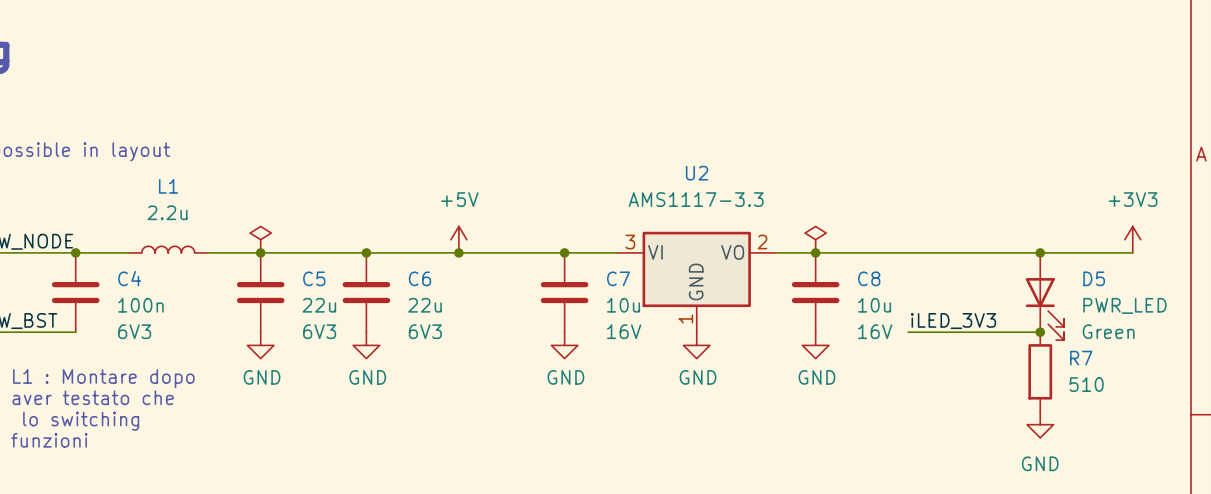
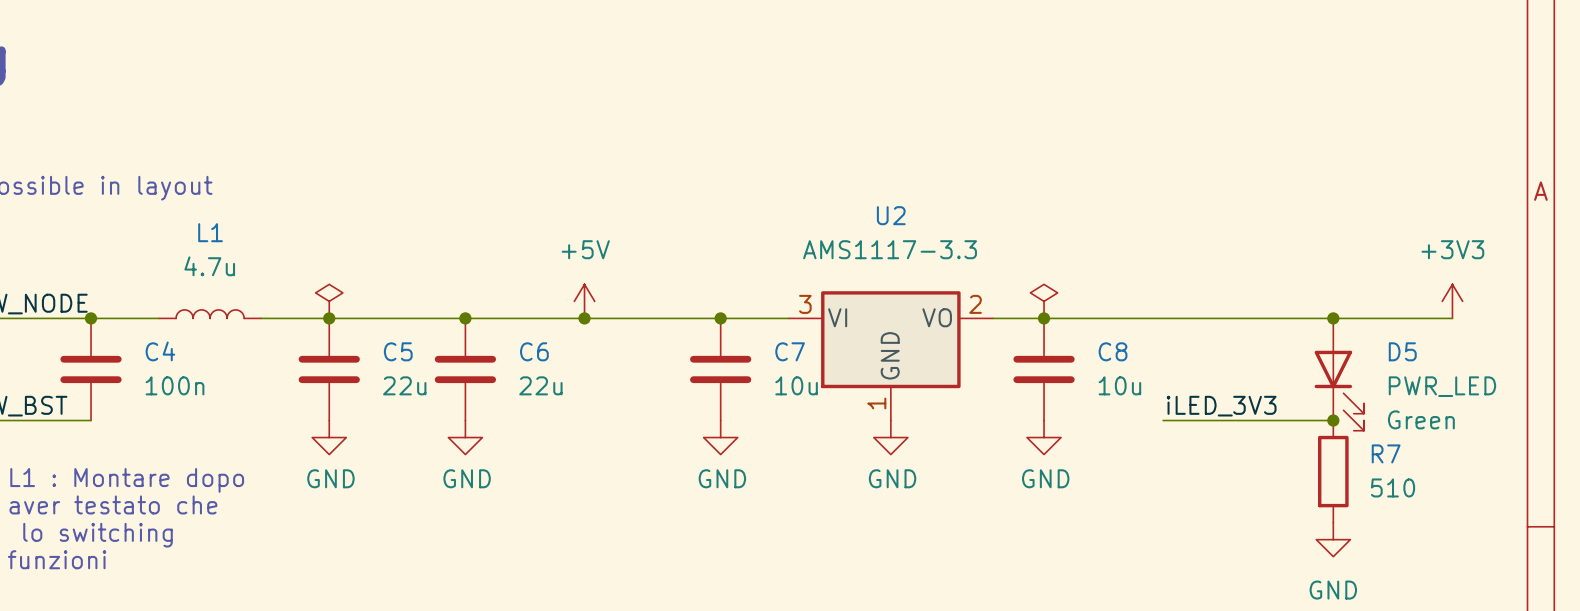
L1 value: 2.2u (167, 212) -> 4.7u (209, 266)
C4 text: 6V3 (134, 331) -> none
C5 text: 6V3 (319, 331) -> none
C6 text: 6V3 (425, 331) -> none
C7 text: 16V (624, 331) -> none
C8 text: 16V (875, 331) -> none

